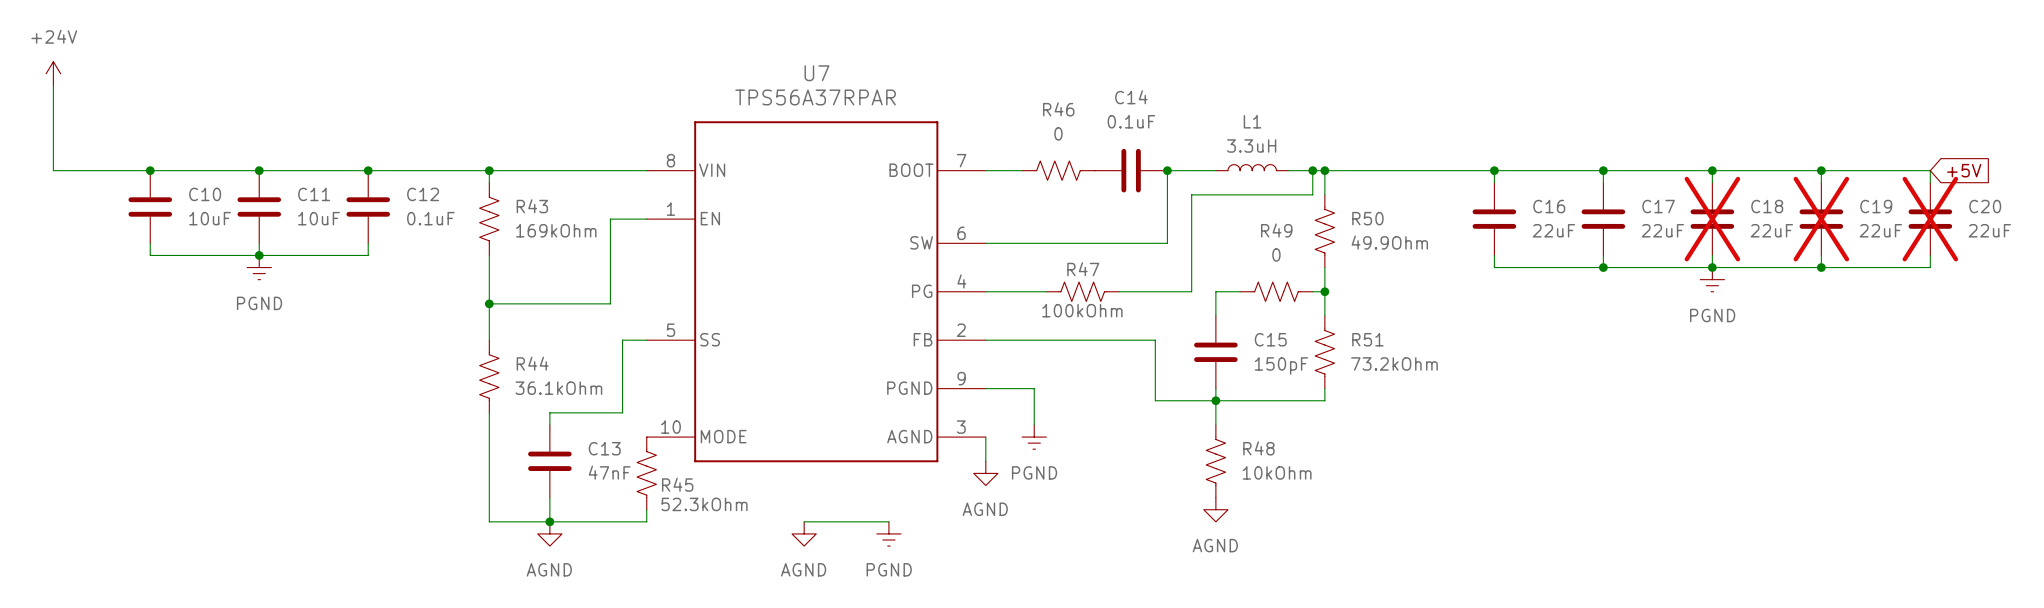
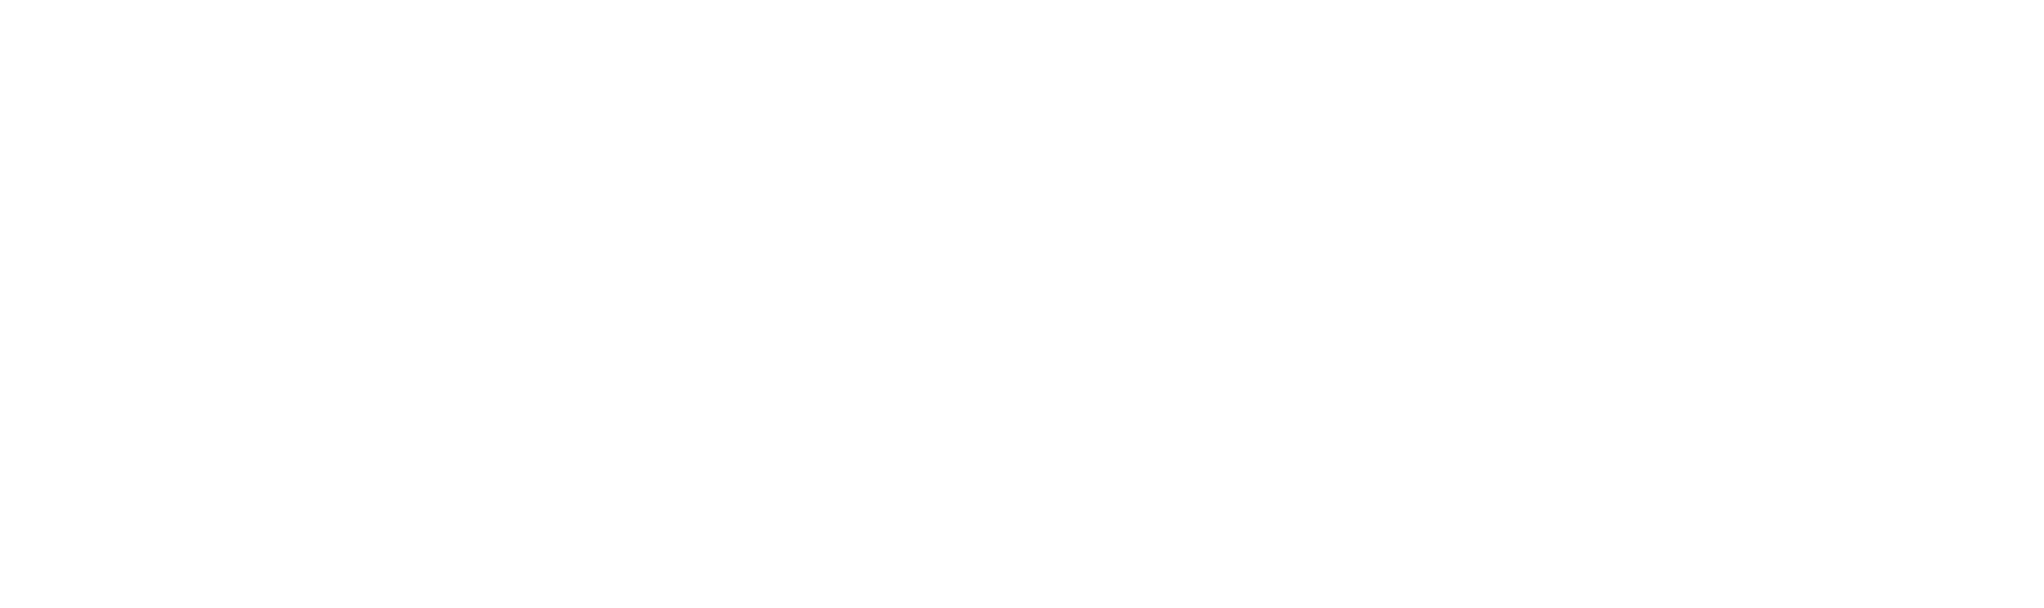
power symbol: +24V (53, 73) -> none
wire: (53, 85) (53, 170) (646, 170) -> none
L1: 3.3uH (1252, 167) -> none
junction: (150, 170) -> none
junction: (259, 170) -> none
junction: (368, 170) -> none
wire: (489, 170) (489, 182) -> none
junction: (489, 170) -> none
wire: (985, 170) (1022, 170) -> none
R46: 0 (1058, 170) -> none
C14: 0.1uF (1131, 170) -> none
junction: (1167, 170) -> none
wire: (1215, 170) (1167, 170) (1167, 243) (985, 243) -> none
wire: (1288, 170) (1930, 170) (1930, 182) -> none
wire: (1312, 170) (1312, 194) (1191, 194) (1191, 291) (1119, 291) -> none
junction: (1312, 170) -> none
wire: (1324, 170) (1324, 194) -> none
junction: (1324, 170) -> none
wire: (1494, 170) (1494, 182) -> none
junction: (1494, 170) -> none
wire: (1603, 170) (1603, 182) -> none
junction: (1603, 170) -> none
wire: (1712, 170) (1712, 182) -> none
junction: (1712, 170) -> none
wire: (1821, 170) (1821, 182) -> none
junction: (1821, 170) -> none
global label: +5V (1964, 170) -> none
C10: 10uF (150, 206) -> none
C11: 10uF (259, 206) -> none
C12: 0.1uF (368, 206) -> none
R43: 169kOhm (489, 219) -> none
wire: (646, 219) (610, 219) (610, 303) (489, 303) -> none
C16: 22uF (1494, 219) -> none
C17: 22uF (1603, 219) -> none
C18: 22uF (1712, 219) -> none
C19: 22uF (1821, 219) -> none
C20: 22uF (1930, 219) -> none
R50: 49.9Ohm (1324, 231) -> none
wire: (150, 243) (150, 255) (368, 255) (368, 243) -> none
wire: (259, 243) (259, 255) -> none
junction: (259, 255) -> none
wire: (489, 255) (489, 340) -> none
wire: (1494, 255) (1494, 267) (1930, 267) (1930, 255) -> none
wire: (1603, 255) (1603, 267) -> none
wire: (1712, 255) (1712, 267) -> none
wire: (1821, 255) (1821, 267) -> none
power symbol: PGND (259, 267) -> none
wire: (1324, 267) (1324, 315) -> none
junction: (1603, 267) -> none
junction: (1712, 267) -> none
junction: (1821, 267) -> none
power symbol: PGND (1712, 279) -> none
U7: TPS56A37RPAR (816, 291) -> none
wire: (985, 291) (1046, 291) -> none
R47: 100kOhm (1082, 291) -> none
wire: (1240, 291) (1215, 291) (1215, 315) -> none
R49: 0 (1276, 291) -> none
wire: (1312, 291) (1324, 291) -> none
junction: (1324, 291) -> none
junction: (489, 303) -> none
wire: (646, 340) (622, 340) (622, 412) (549, 412) (549, 424) -> none
wire: (985, 340) (1155, 340) (1155, 400) (1324, 400) (1324, 388) -> none
C15: 150pF (1215, 352) -> none
R51: 73.2kOhm (1324, 352) -> none
R44: 36.1kOhm (489, 376) -> none
wire: (985, 388) (1034, 388) (1034, 424) -> none
wire: (1215, 388) (1215, 424) -> none
junction: (1215, 400) -> none
wire: (489, 412) (489, 521) (646, 521) (646, 509) -> none
wire: (985, 437) (985, 461) -> none
power symbol: PGND (1034, 437) -> none
C13: 47nF (549, 461) -> none
R48: 10kOhm (1215, 461) -> none
R45: 52.3kOhm (646, 473) -> none
power symbol: AGND (985, 473) -> none
wire: (549, 497) (549, 521) -> none
power symbol: AGND (1215, 509) -> none
junction: (549, 521) -> none
wire: (804, 521) (888, 521) -> none
power symbol: AGND (549, 533) -> none
power symbol: AGND (804, 533) -> none
power symbol: PGND (888, 533) -> none

